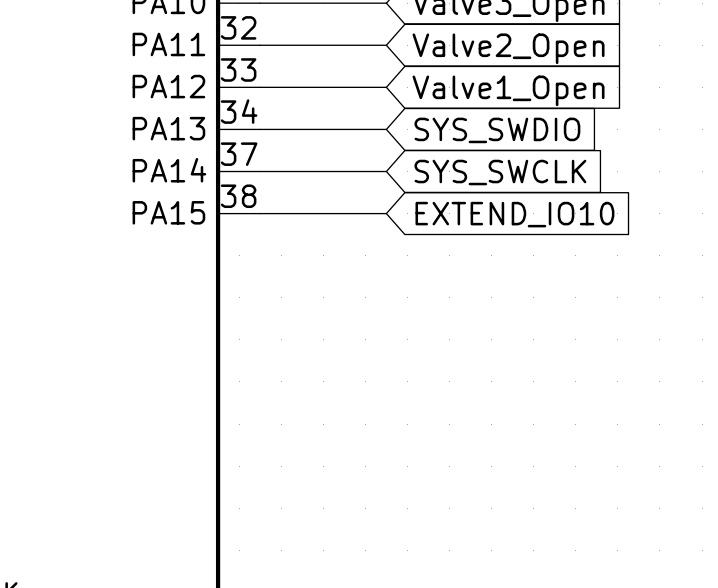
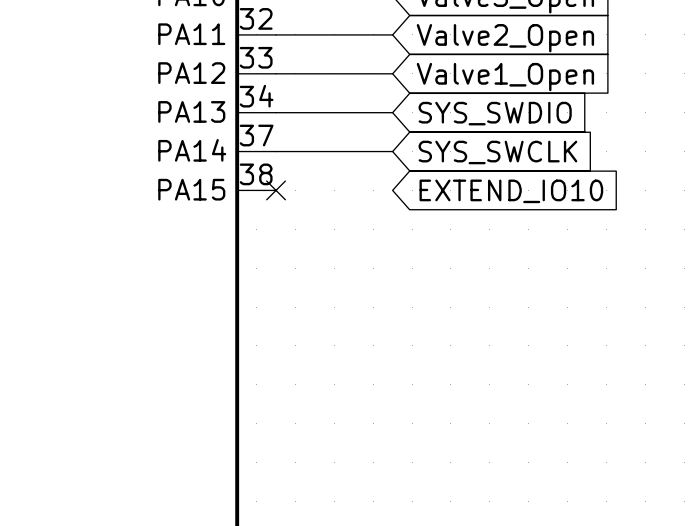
wire: (260, 213) (386, 213) -> none
no-connect mark: none -> (276, 190)

